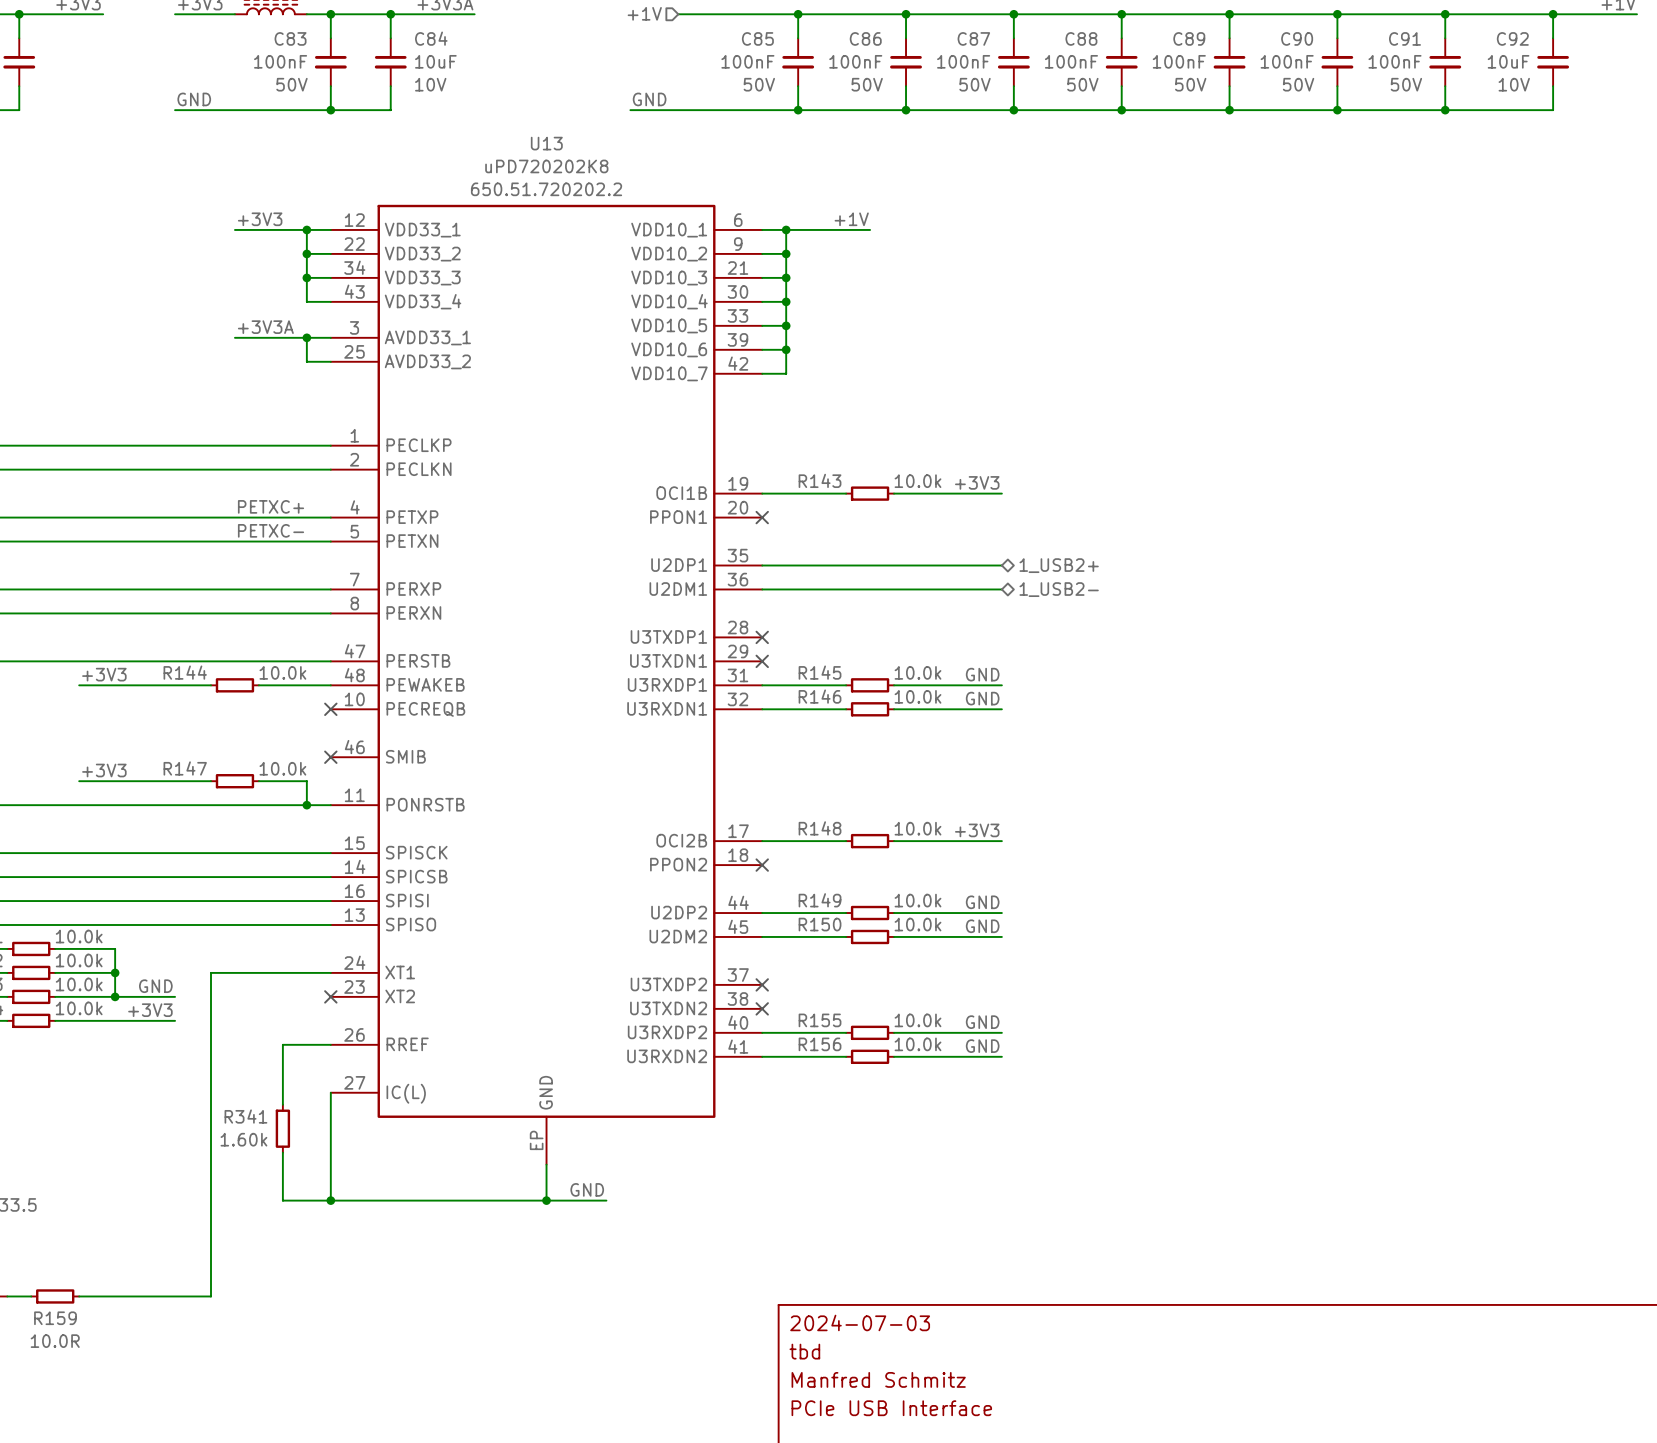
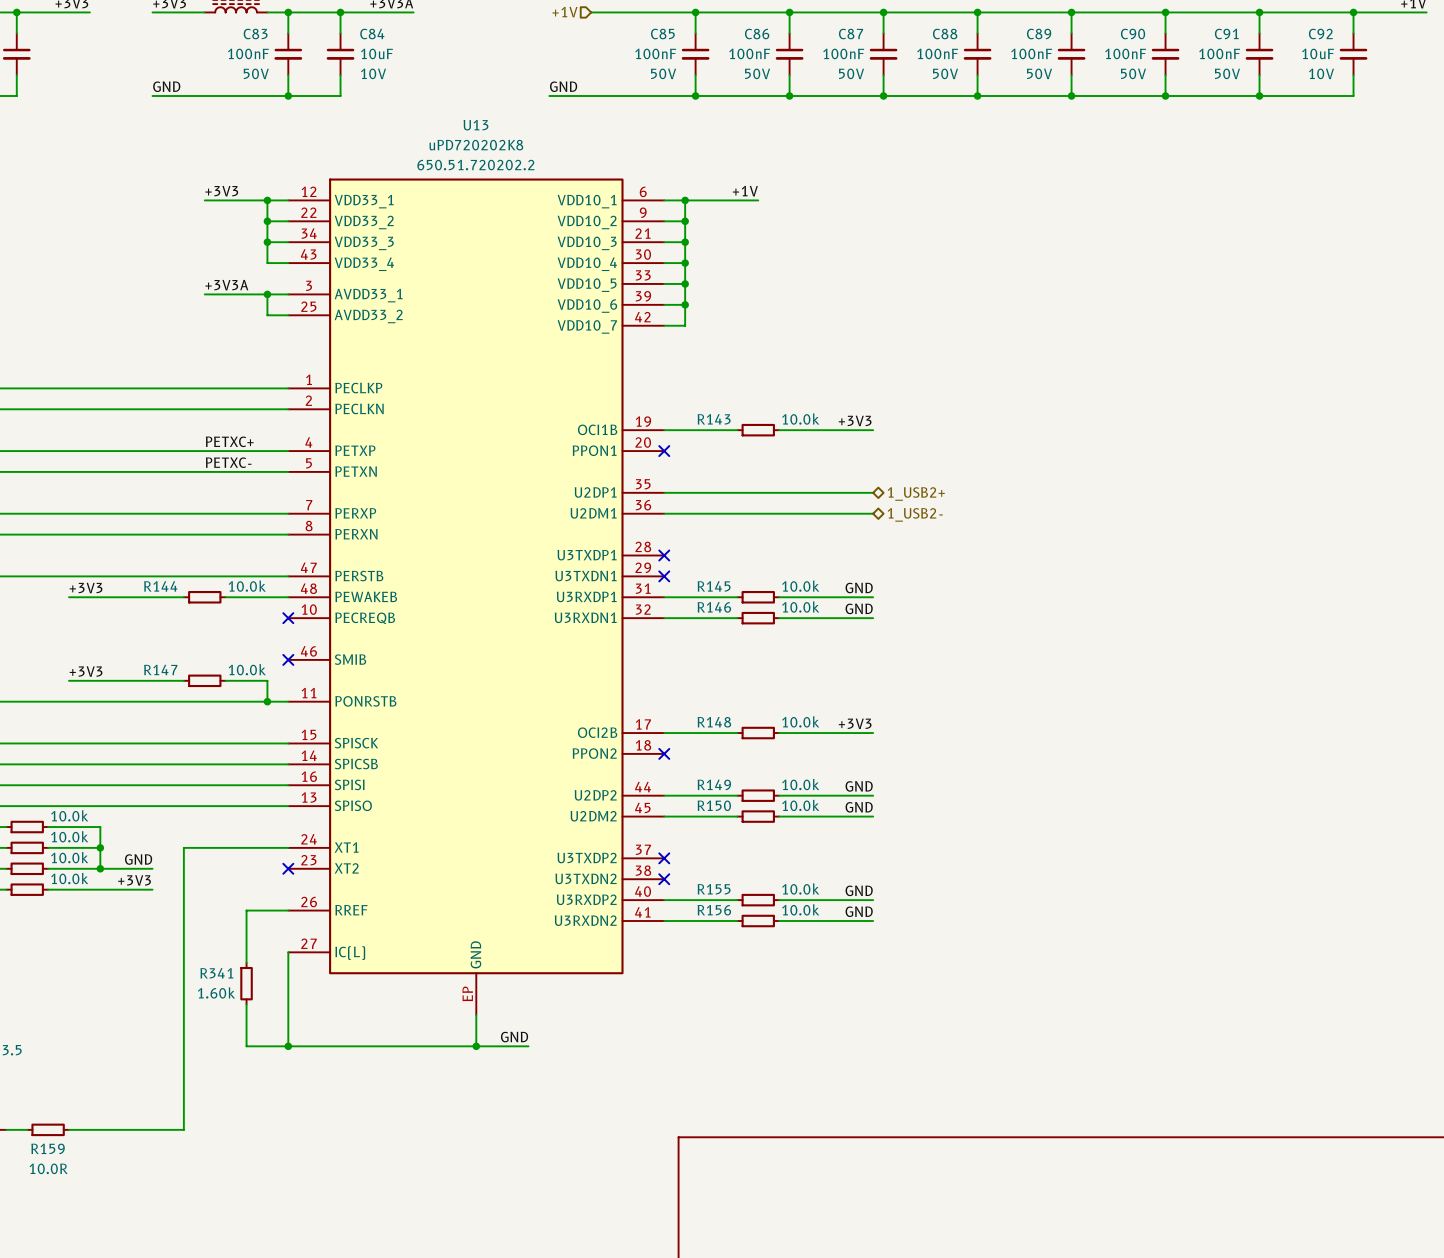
title block: 2024-07-03 (860, 1322) -> none
title block: tbd (804, 1351) -> none
title block: Manfred Schmitz (878, 1379) -> none
title block: PCIe USB Interface (891, 1408) -> none

